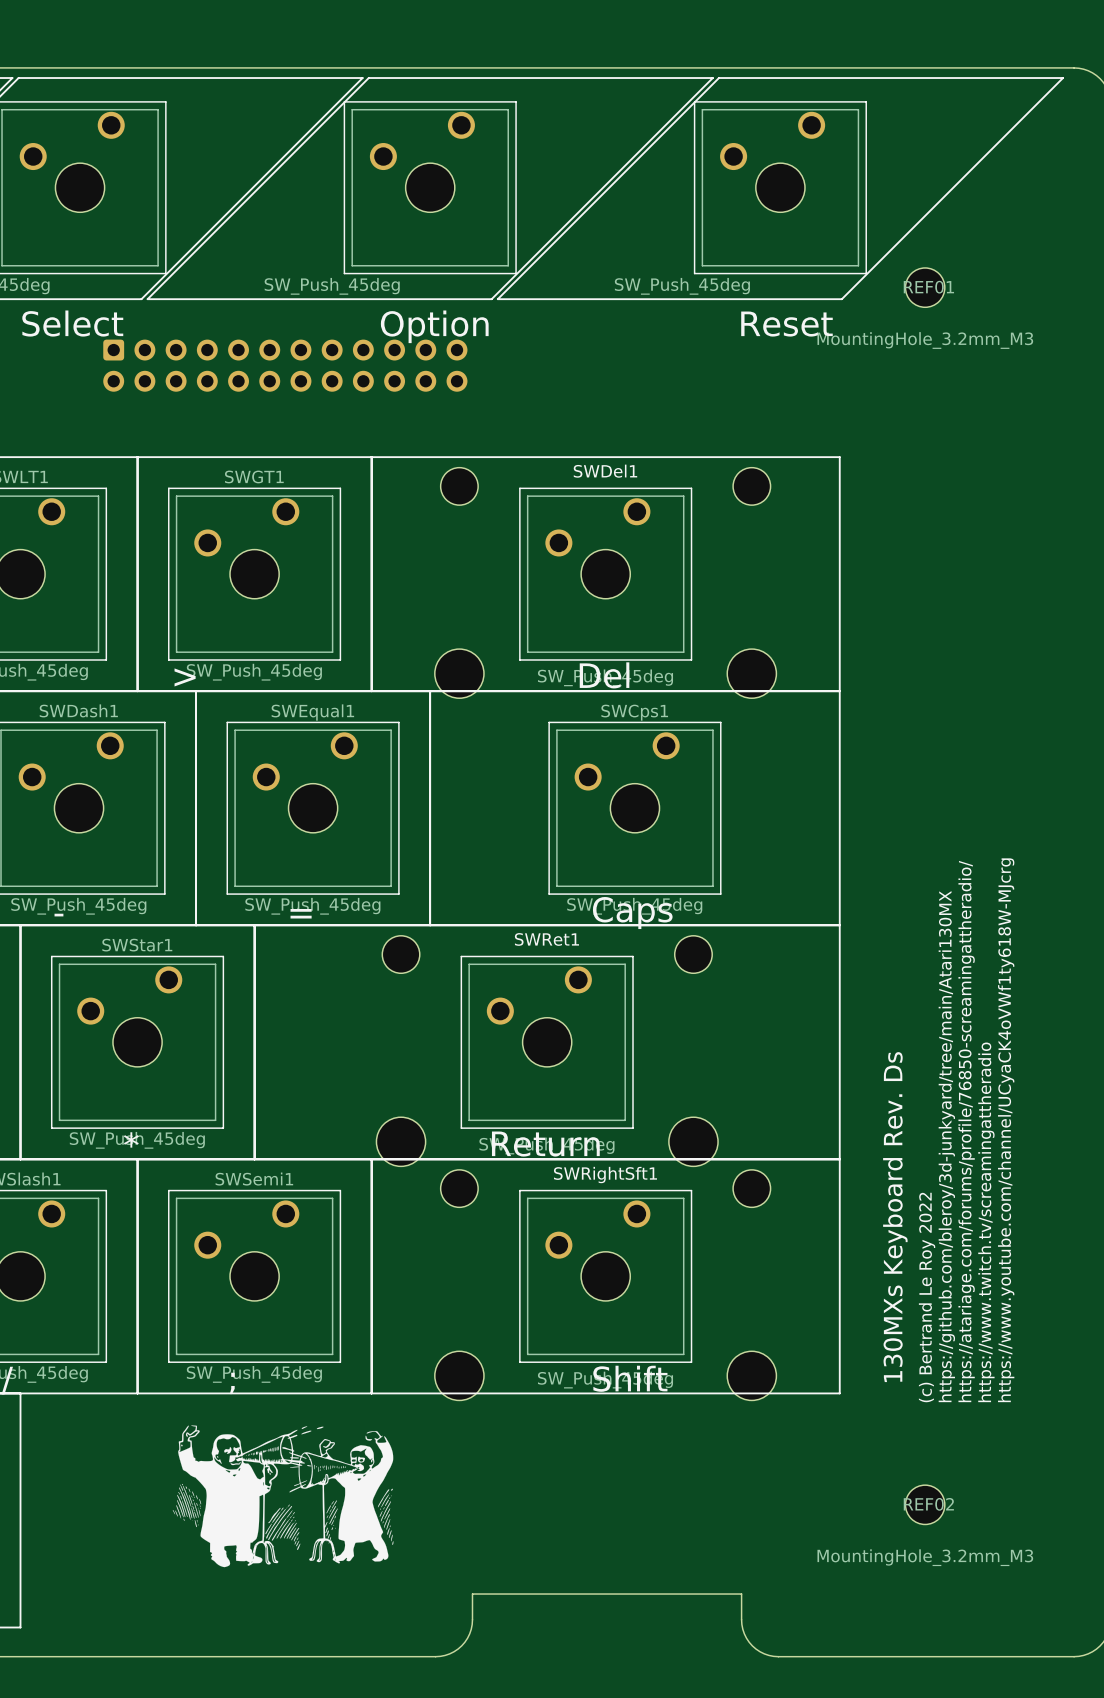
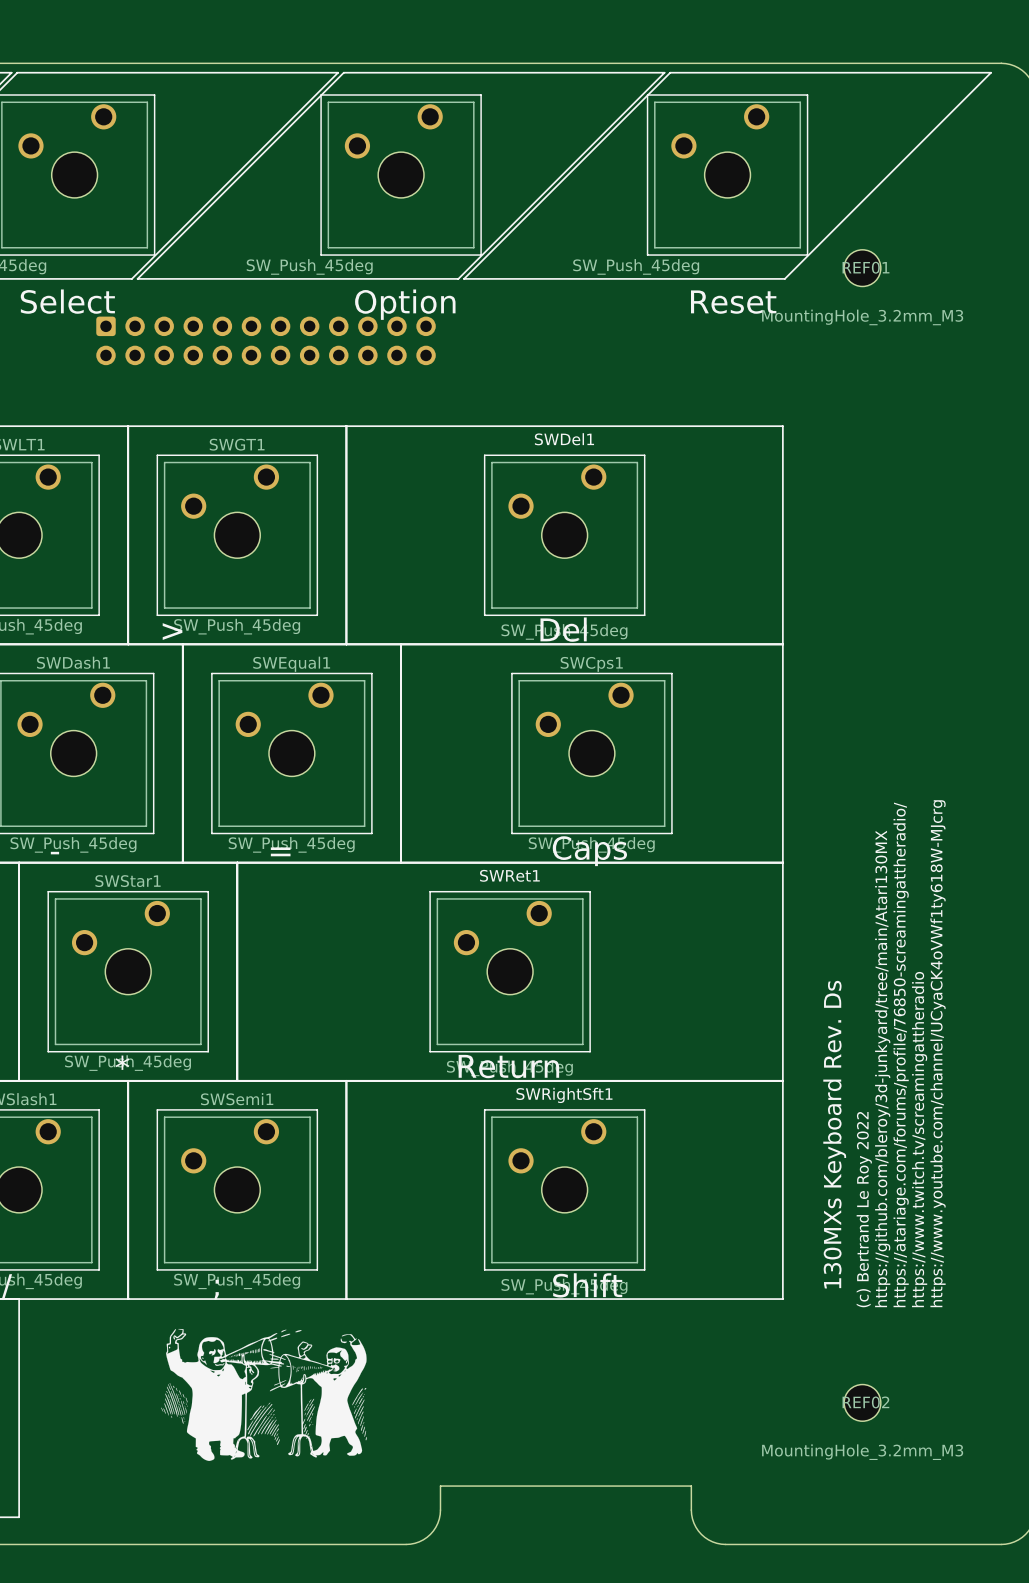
SWDel1 footprint: [370, 456, 841, 699] -> [345, 425, 784, 646]
SWRet1 footprint: [253, 924, 841, 1167] -> [236, 861, 784, 1082]
SWRightSft1 footprint: [370, 1158, 841, 1401] -> [345, 1079, 784, 1300]

